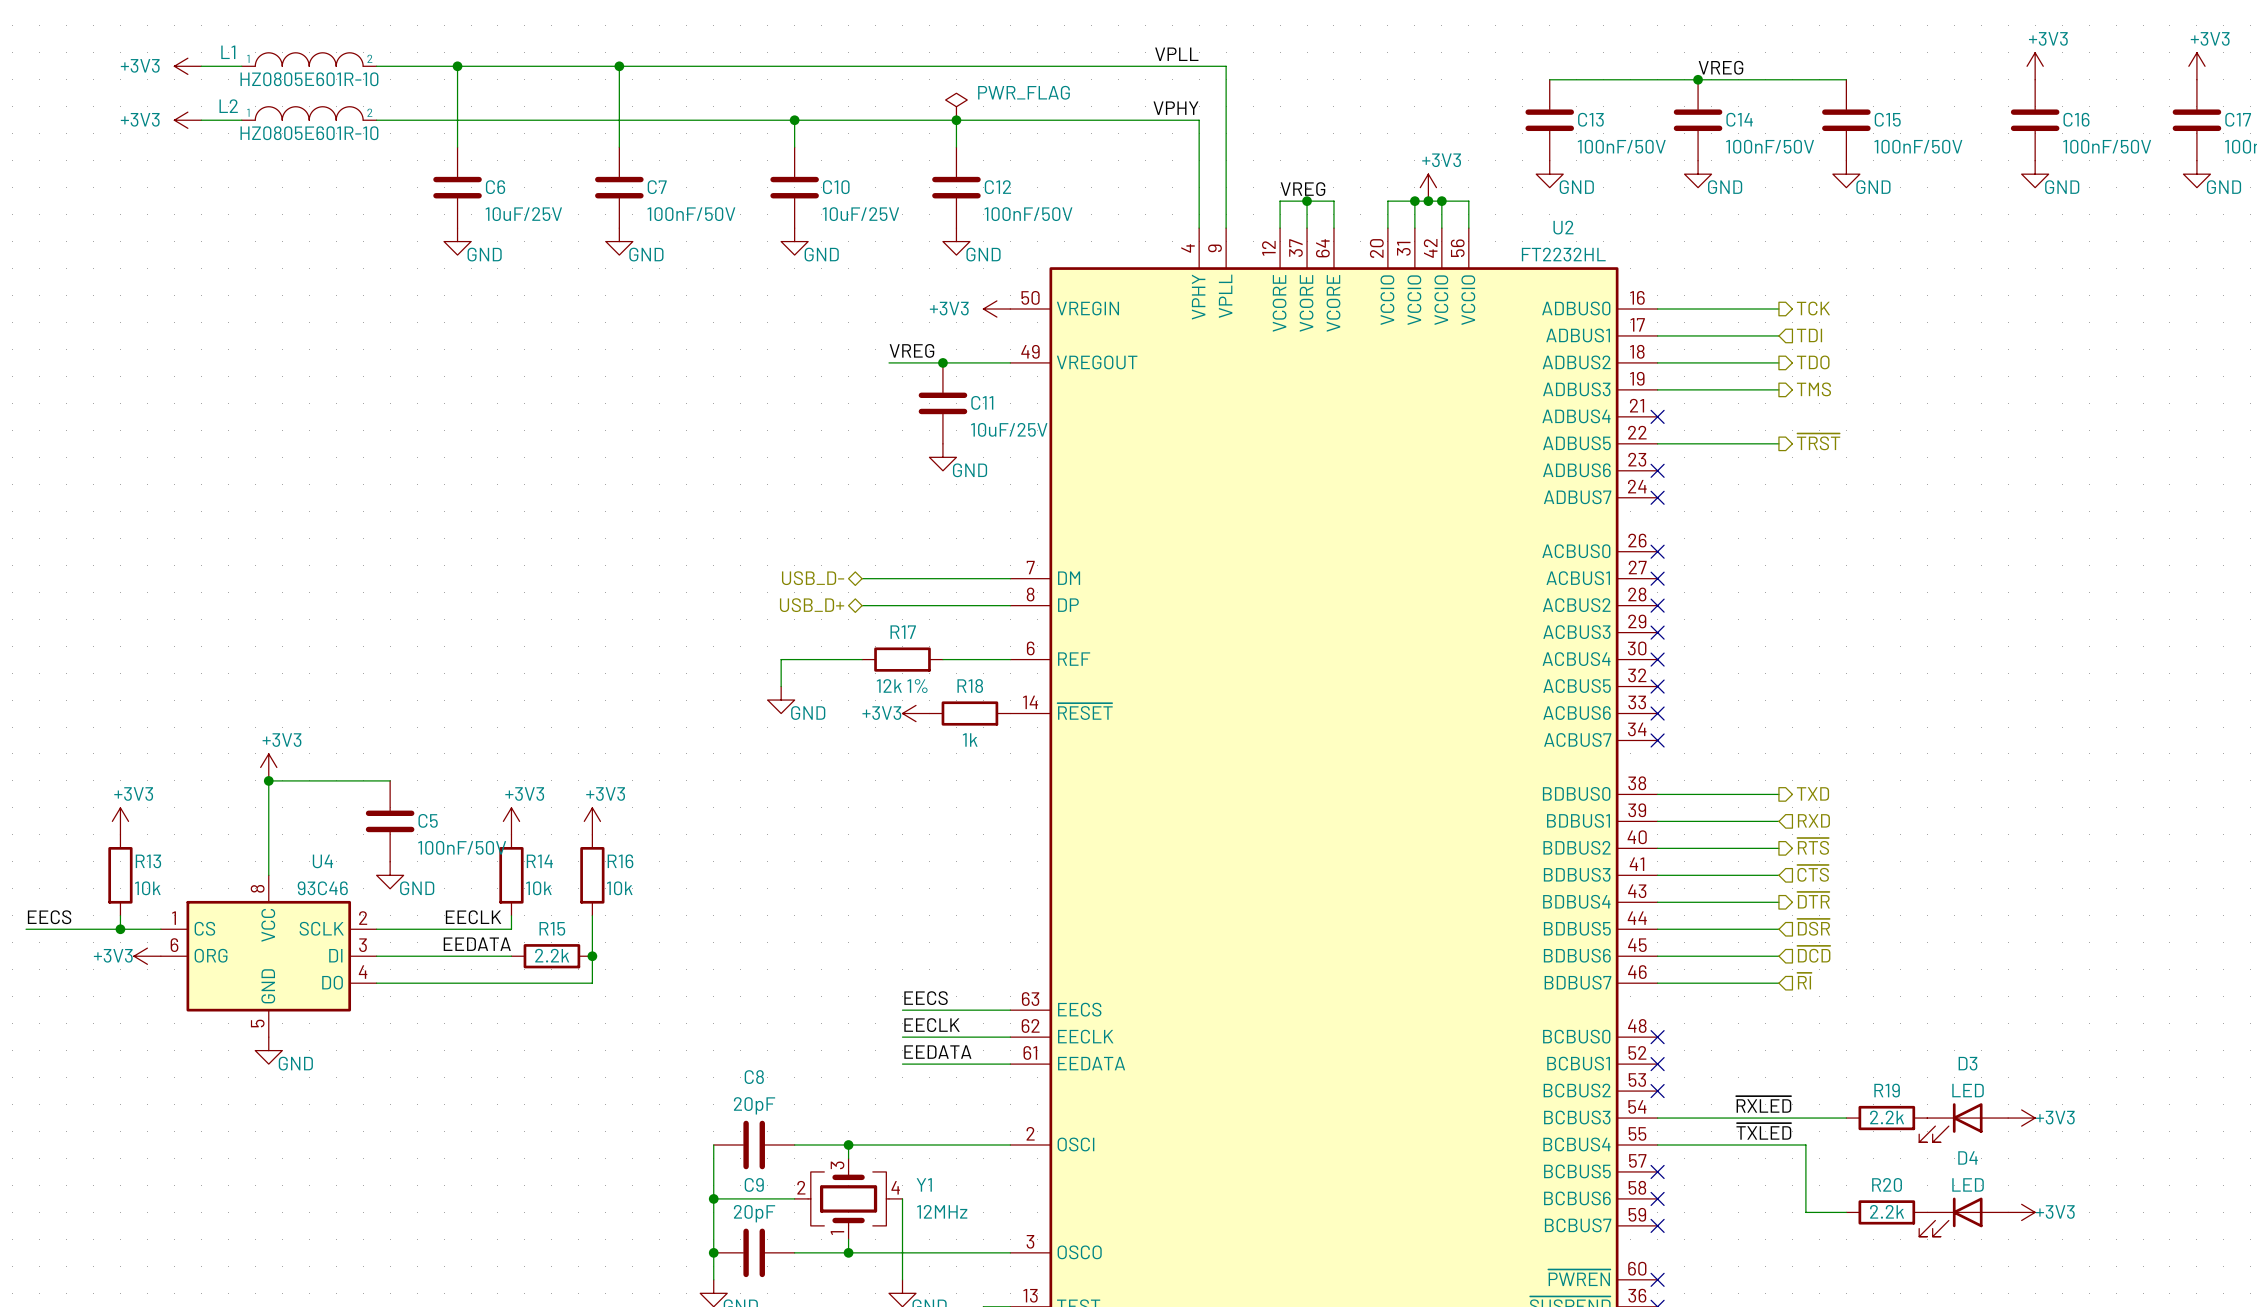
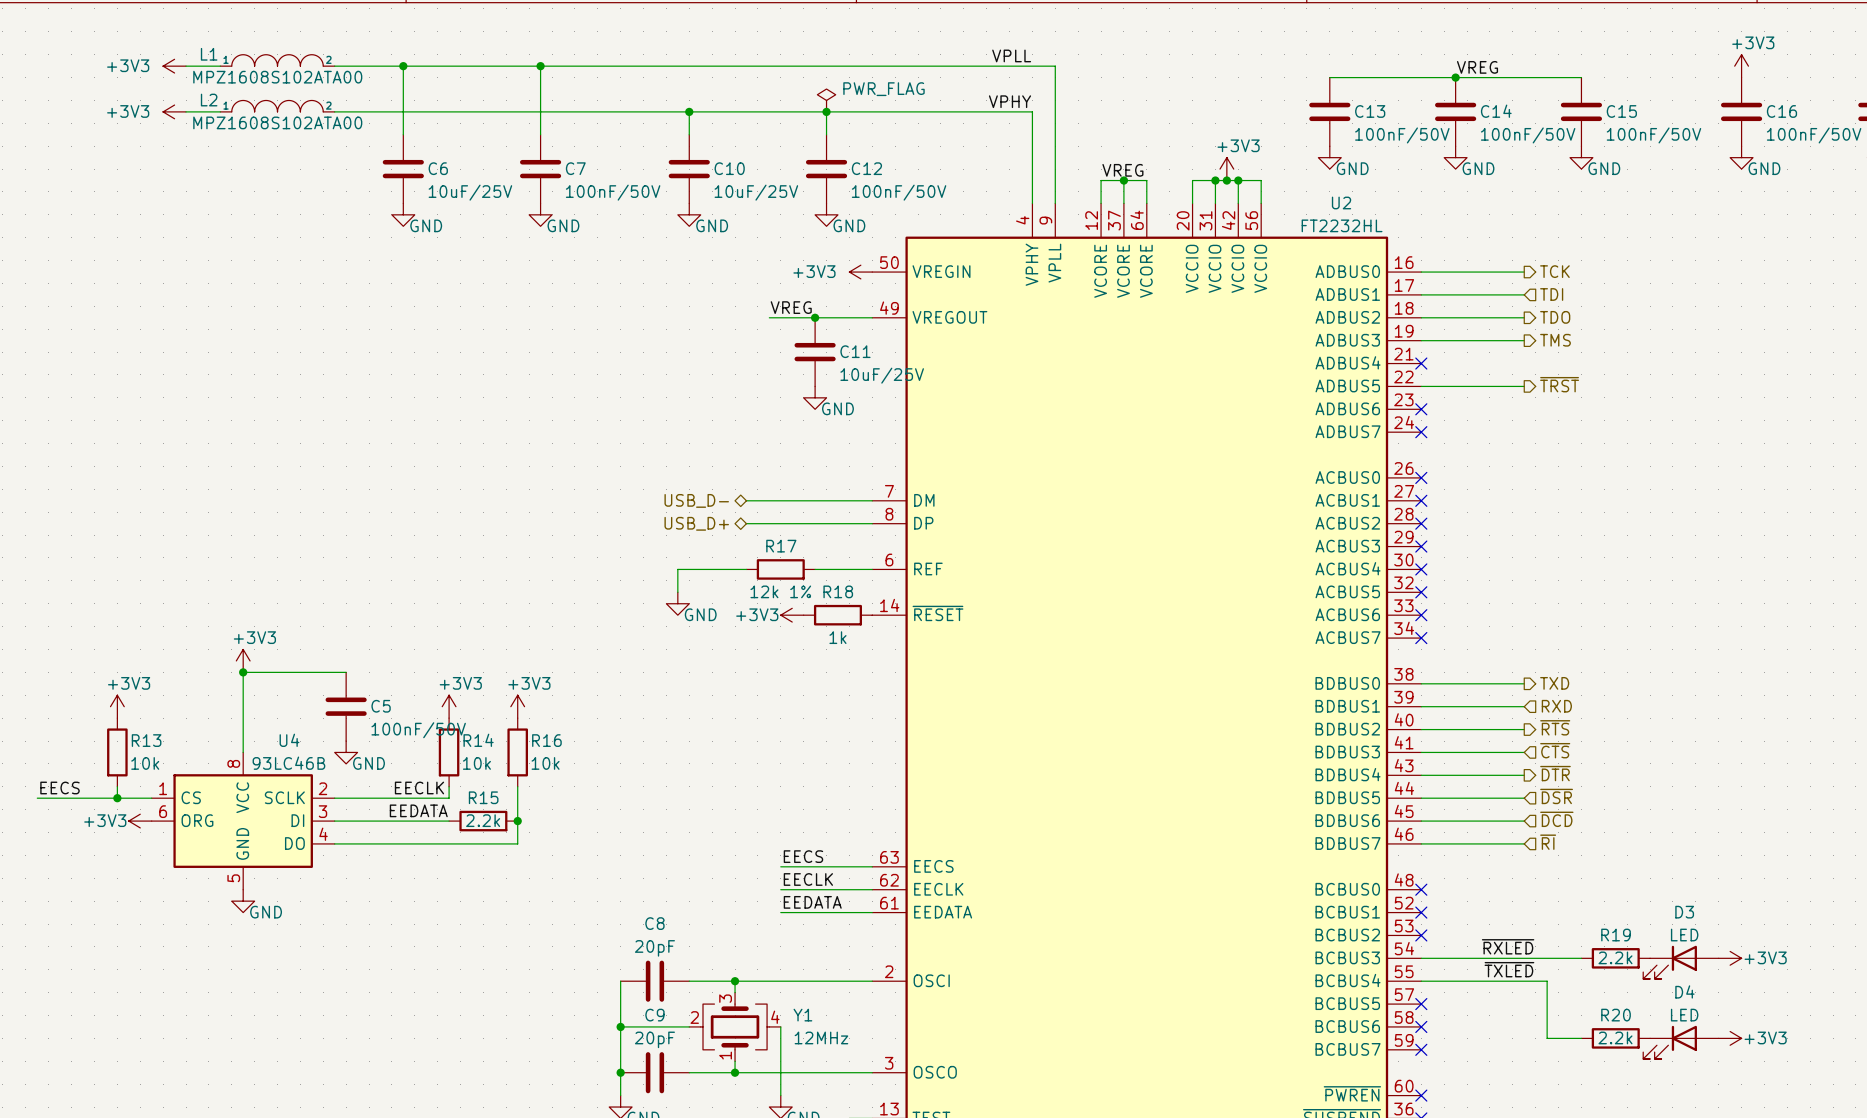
L1 value: HZ0805E601R-10 (309, 79) -> MPZ1608S102ATA00 (277, 77)
L2 value: HZ0805E601R-10 (309, 133) -> MPZ1608S102ATA00 (277, 122)
U4 value: 93C46 (322, 888) -> 93LC46B (288, 763)

